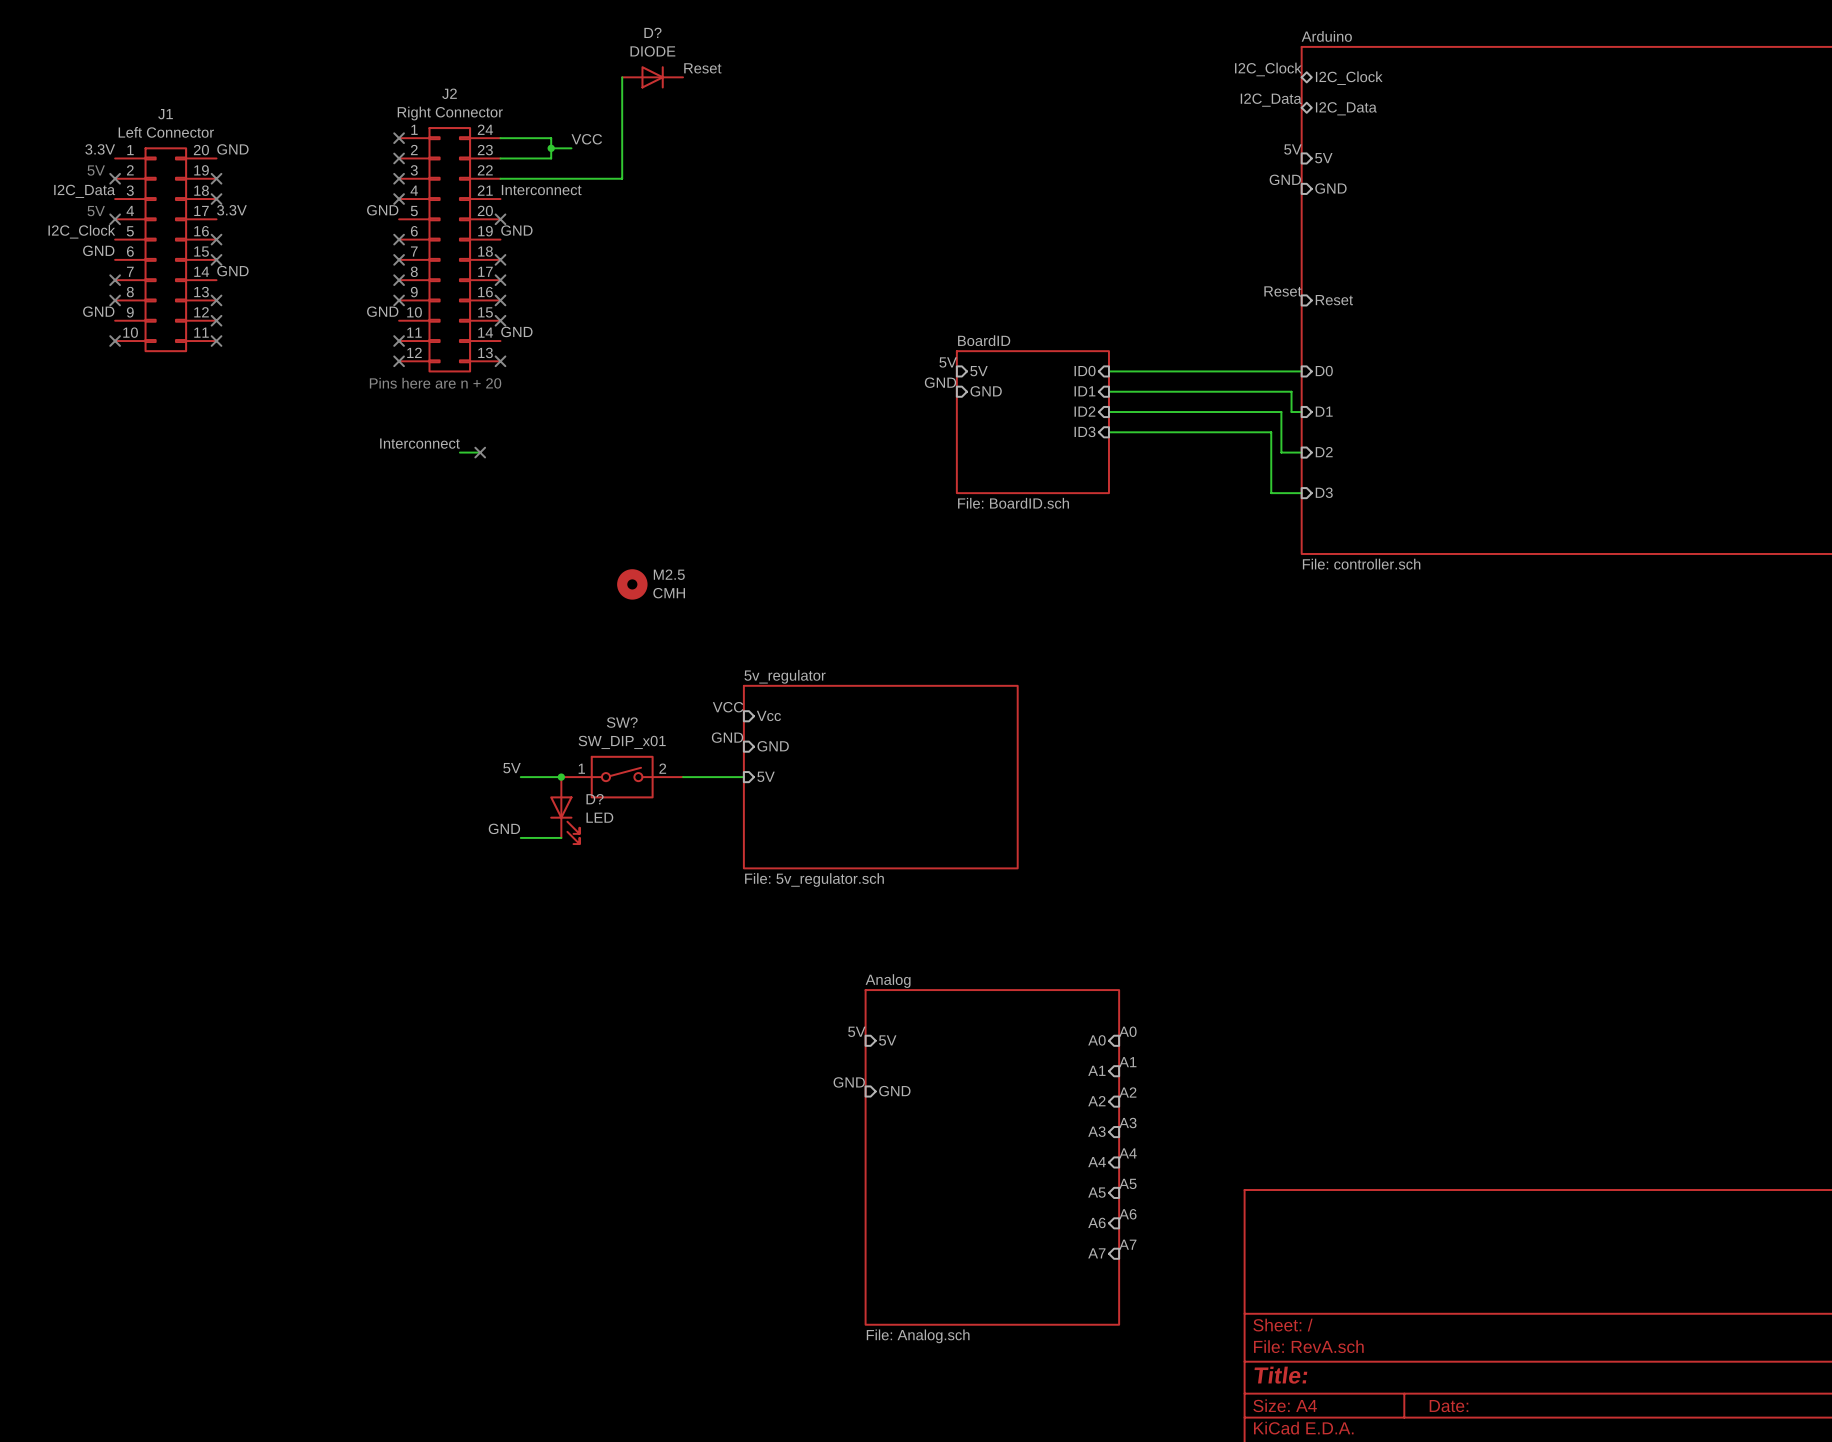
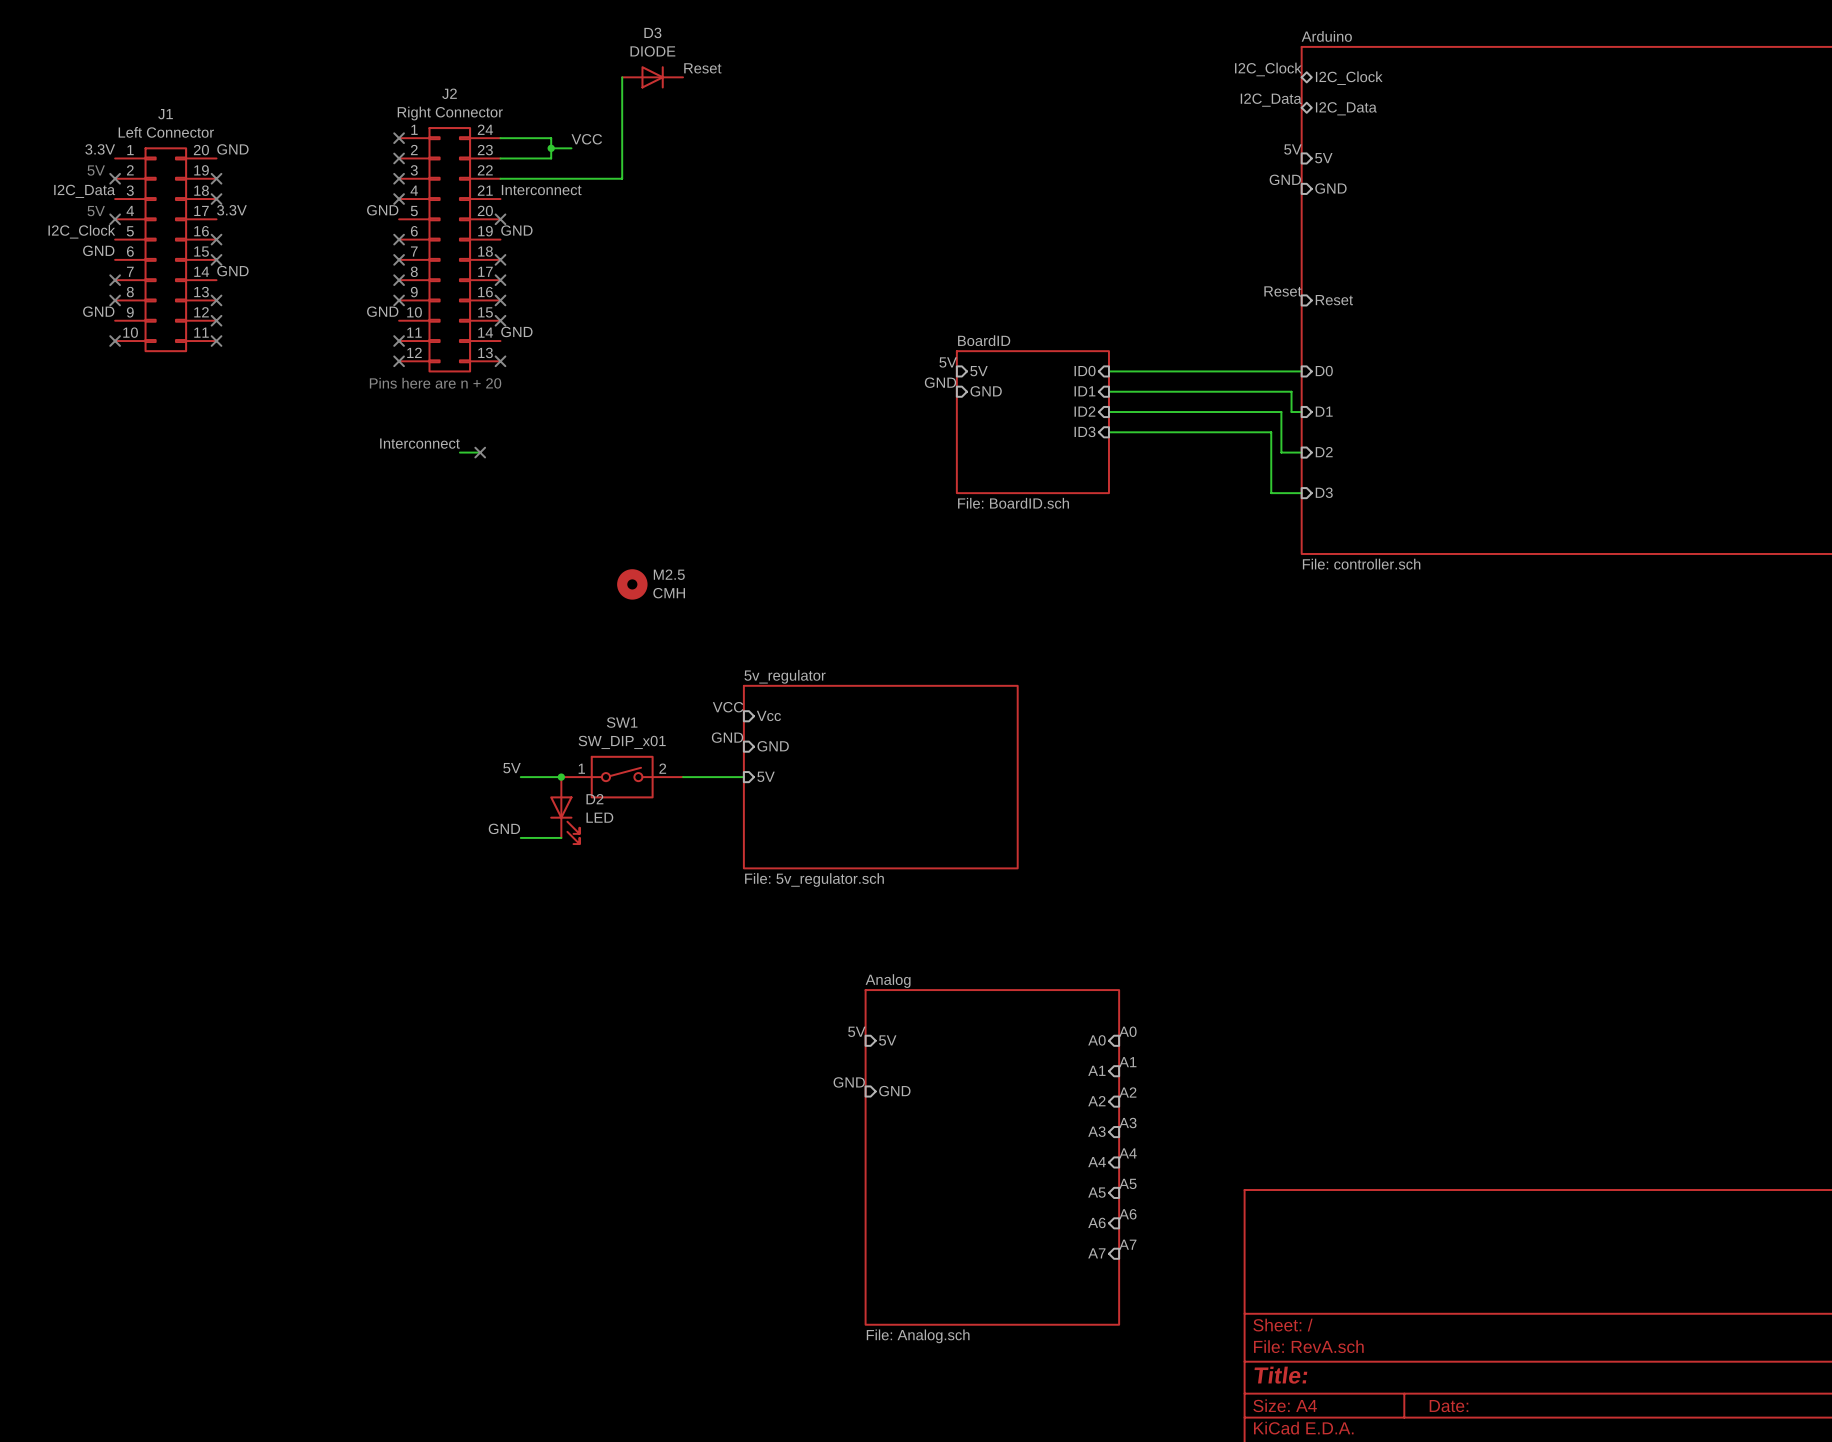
D? name: D? (652, 32) -> D3 (652, 32)
SW? name: SW? (622, 722) -> SW1 (622, 722)
D? name: D? (595, 799) -> D2 (594, 799)

